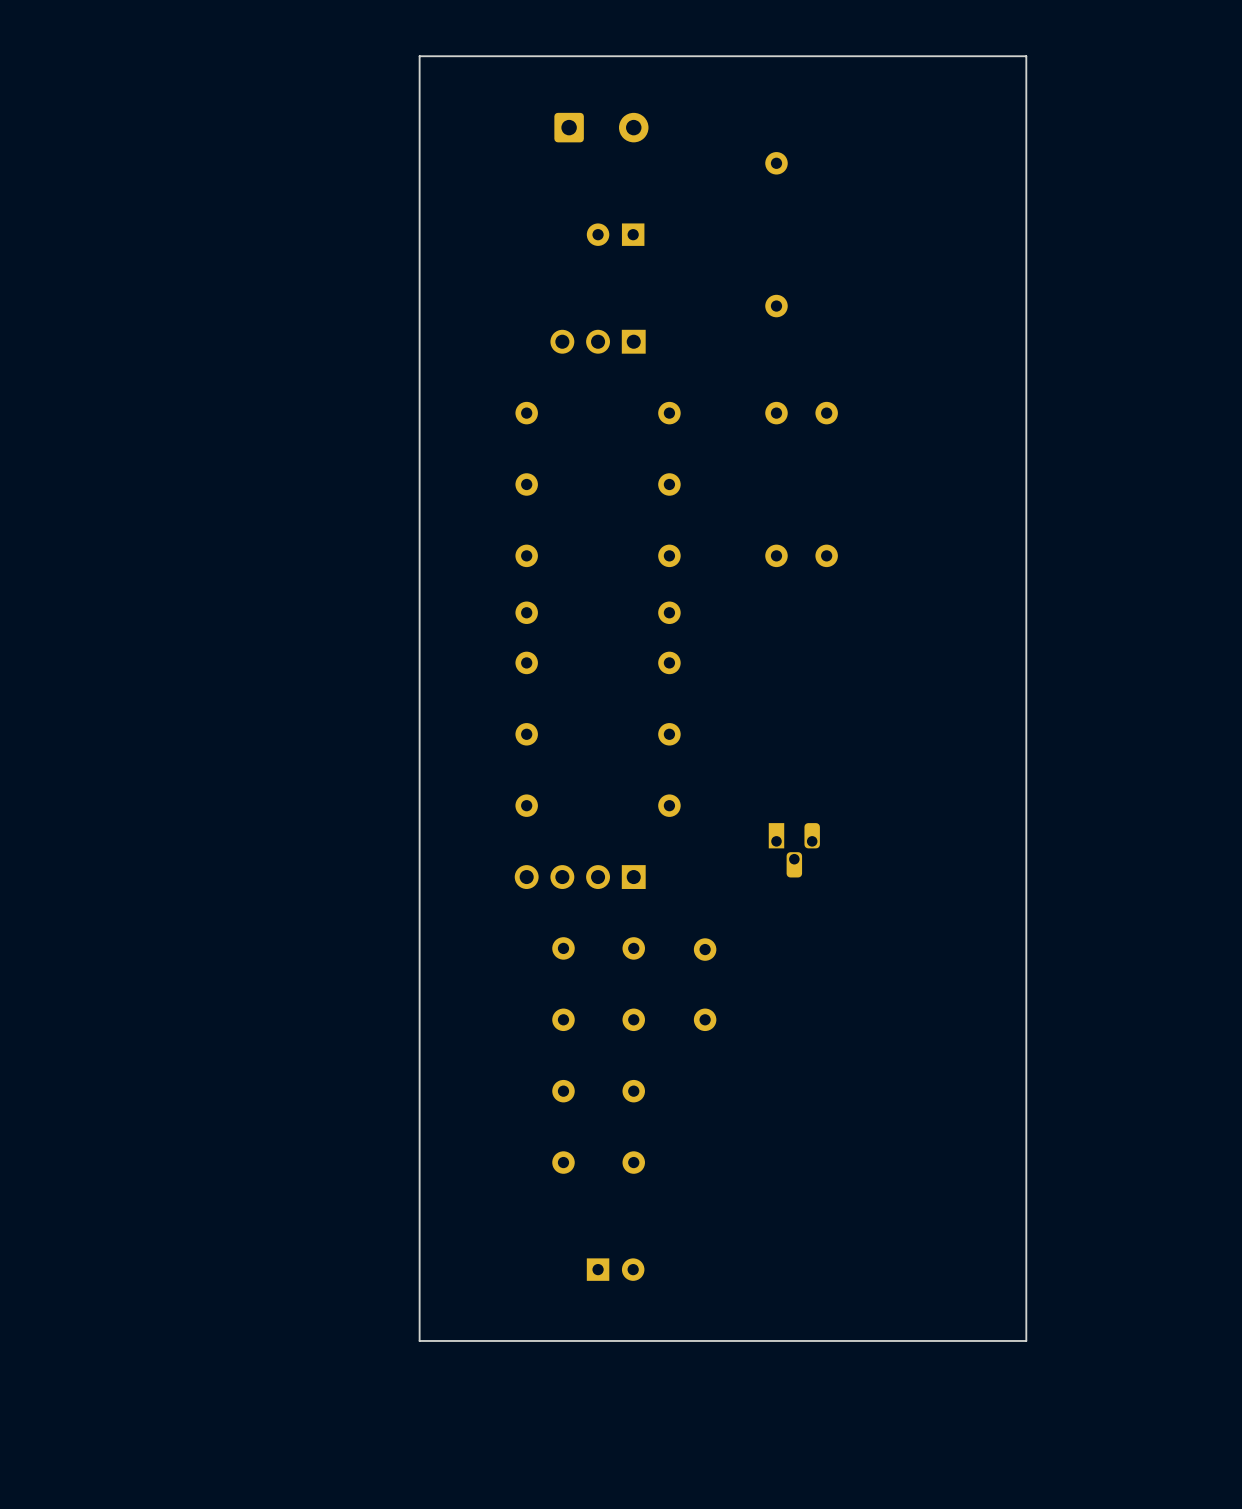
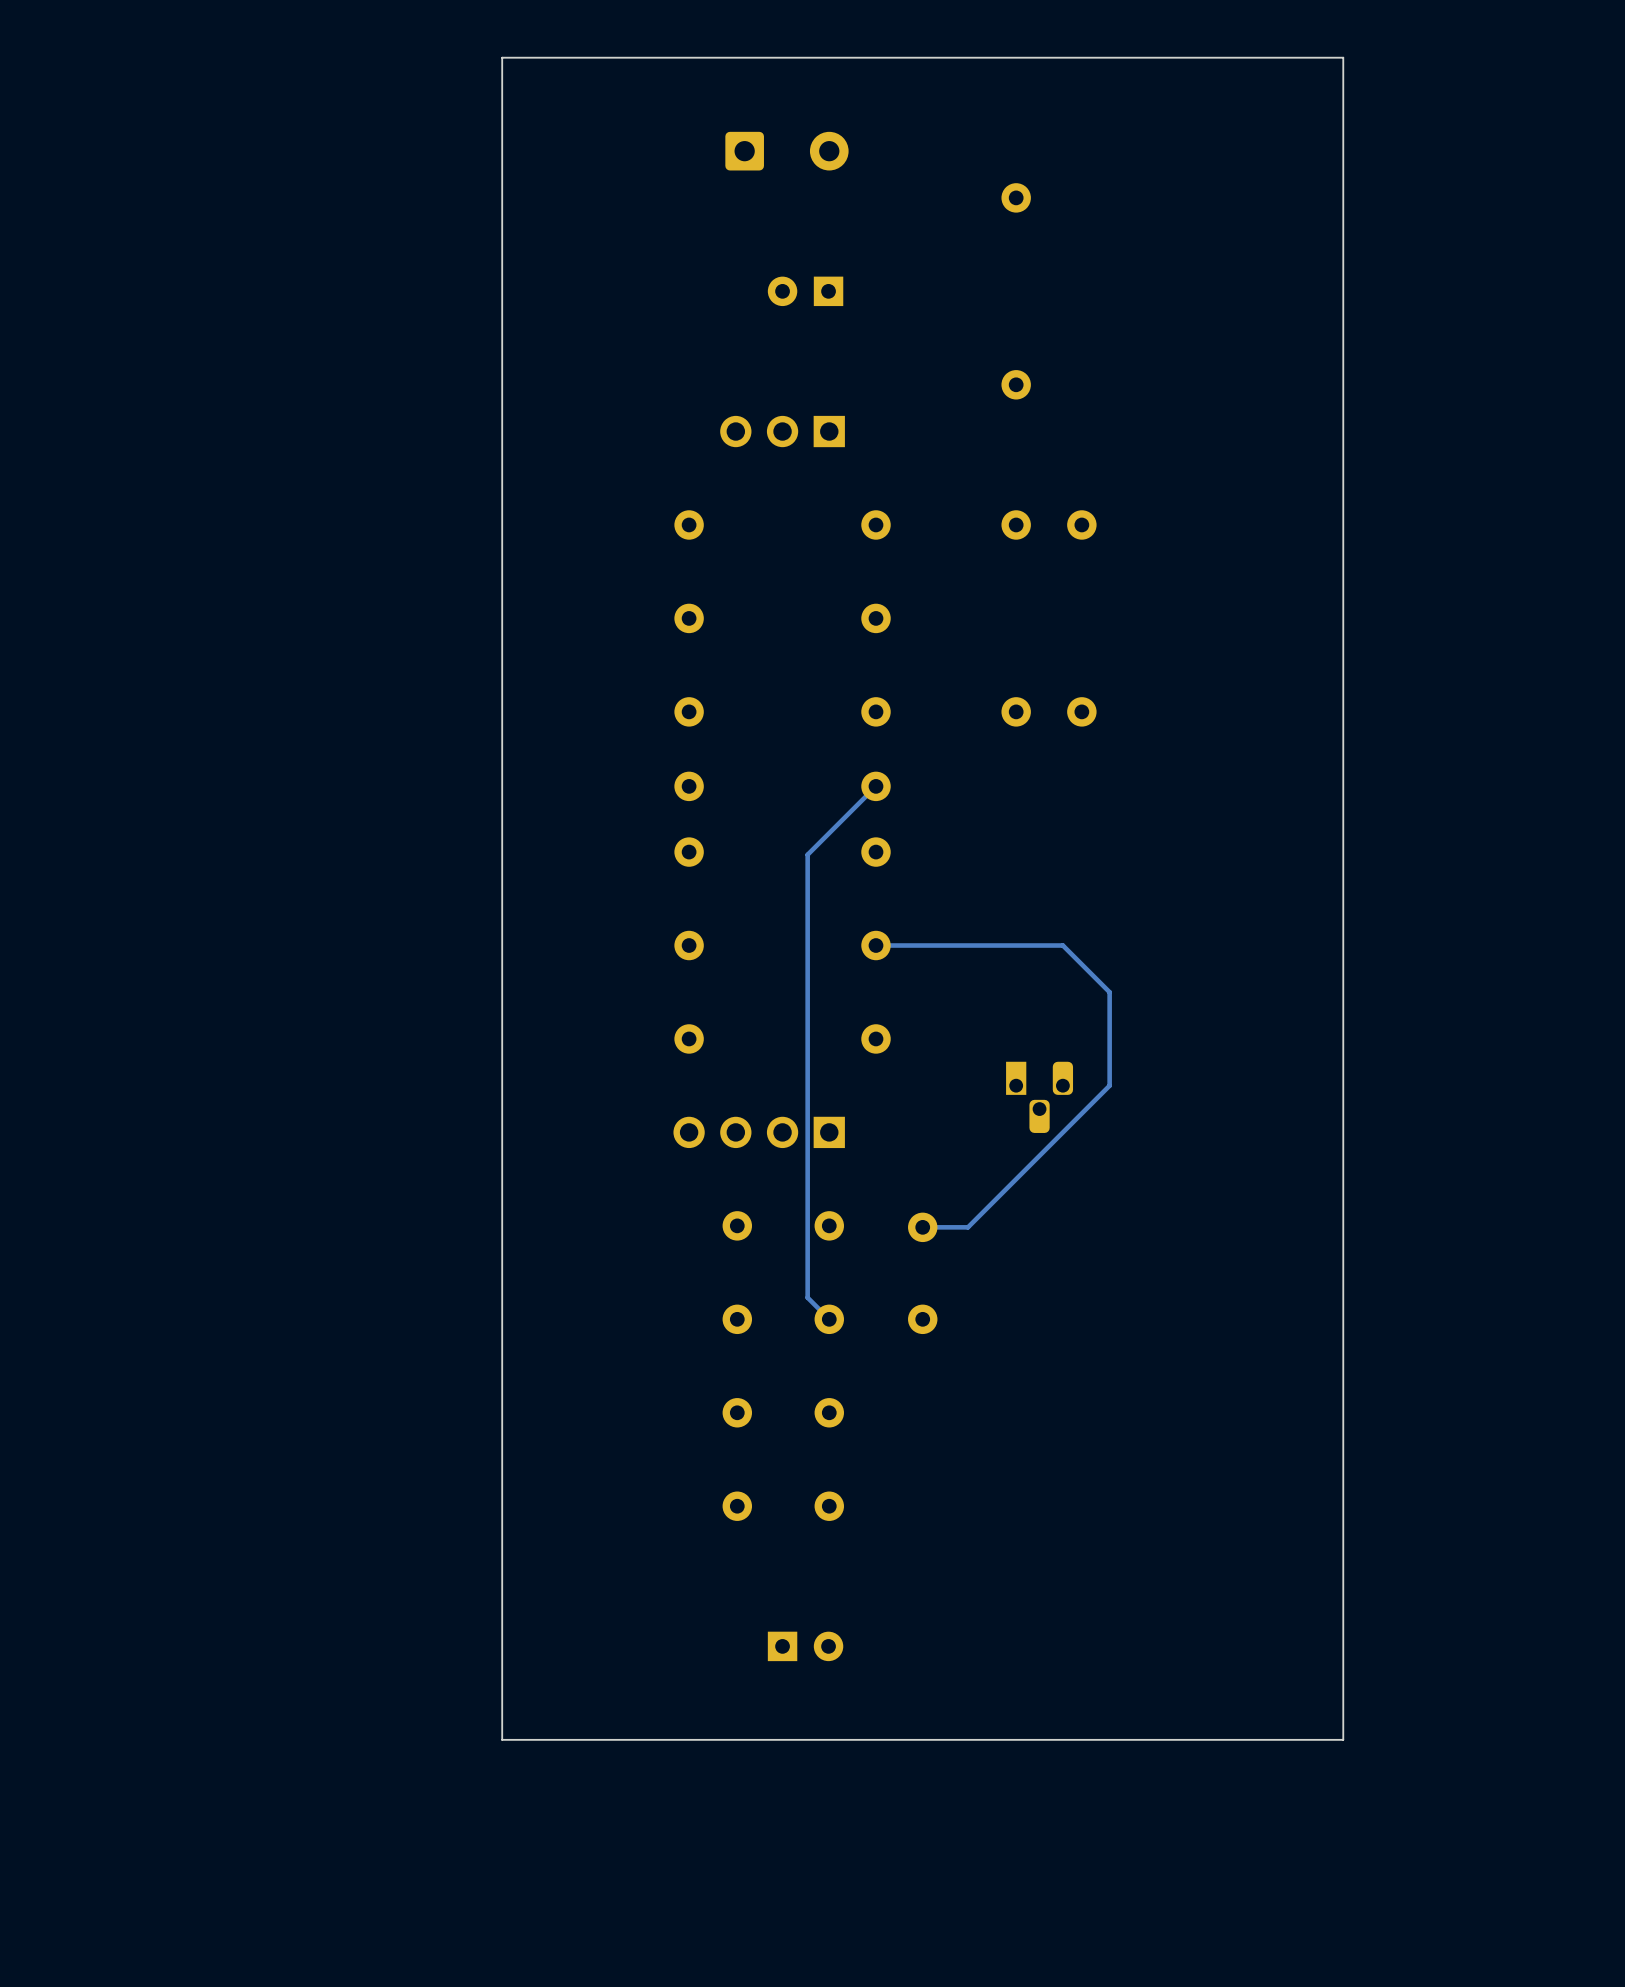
board edge: (419, 56) (419, 1340) -> (548, 57) (502, 57) (502, 1739) (548, 1739)
track: none -> (876, 786) (807, 854) (807, 1297) (829, 1319)
track: none -> (876, 945) (1062, 945) (1109, 992) (1109, 1085) (967, 1227) (922, 1227)

